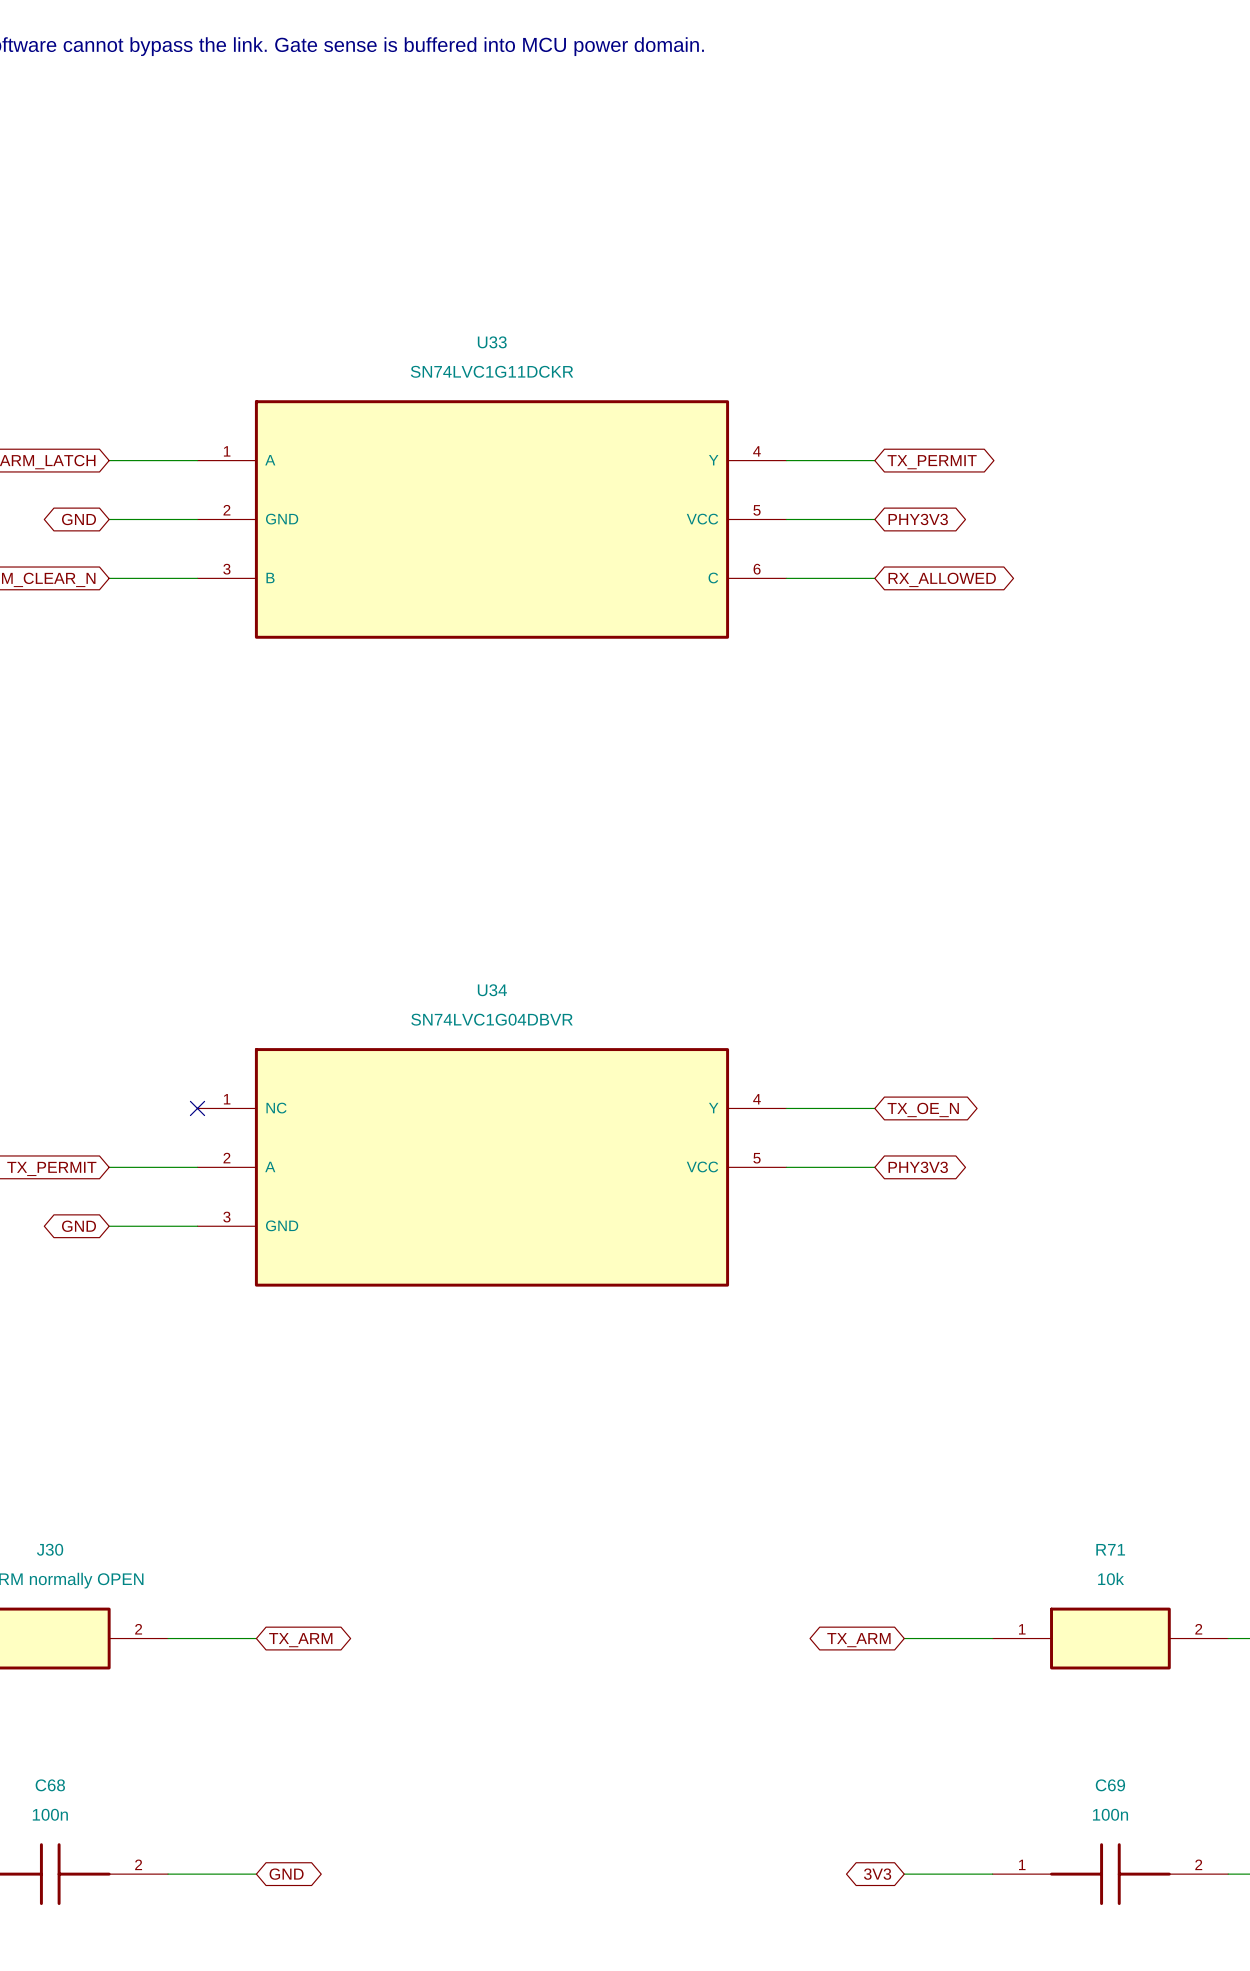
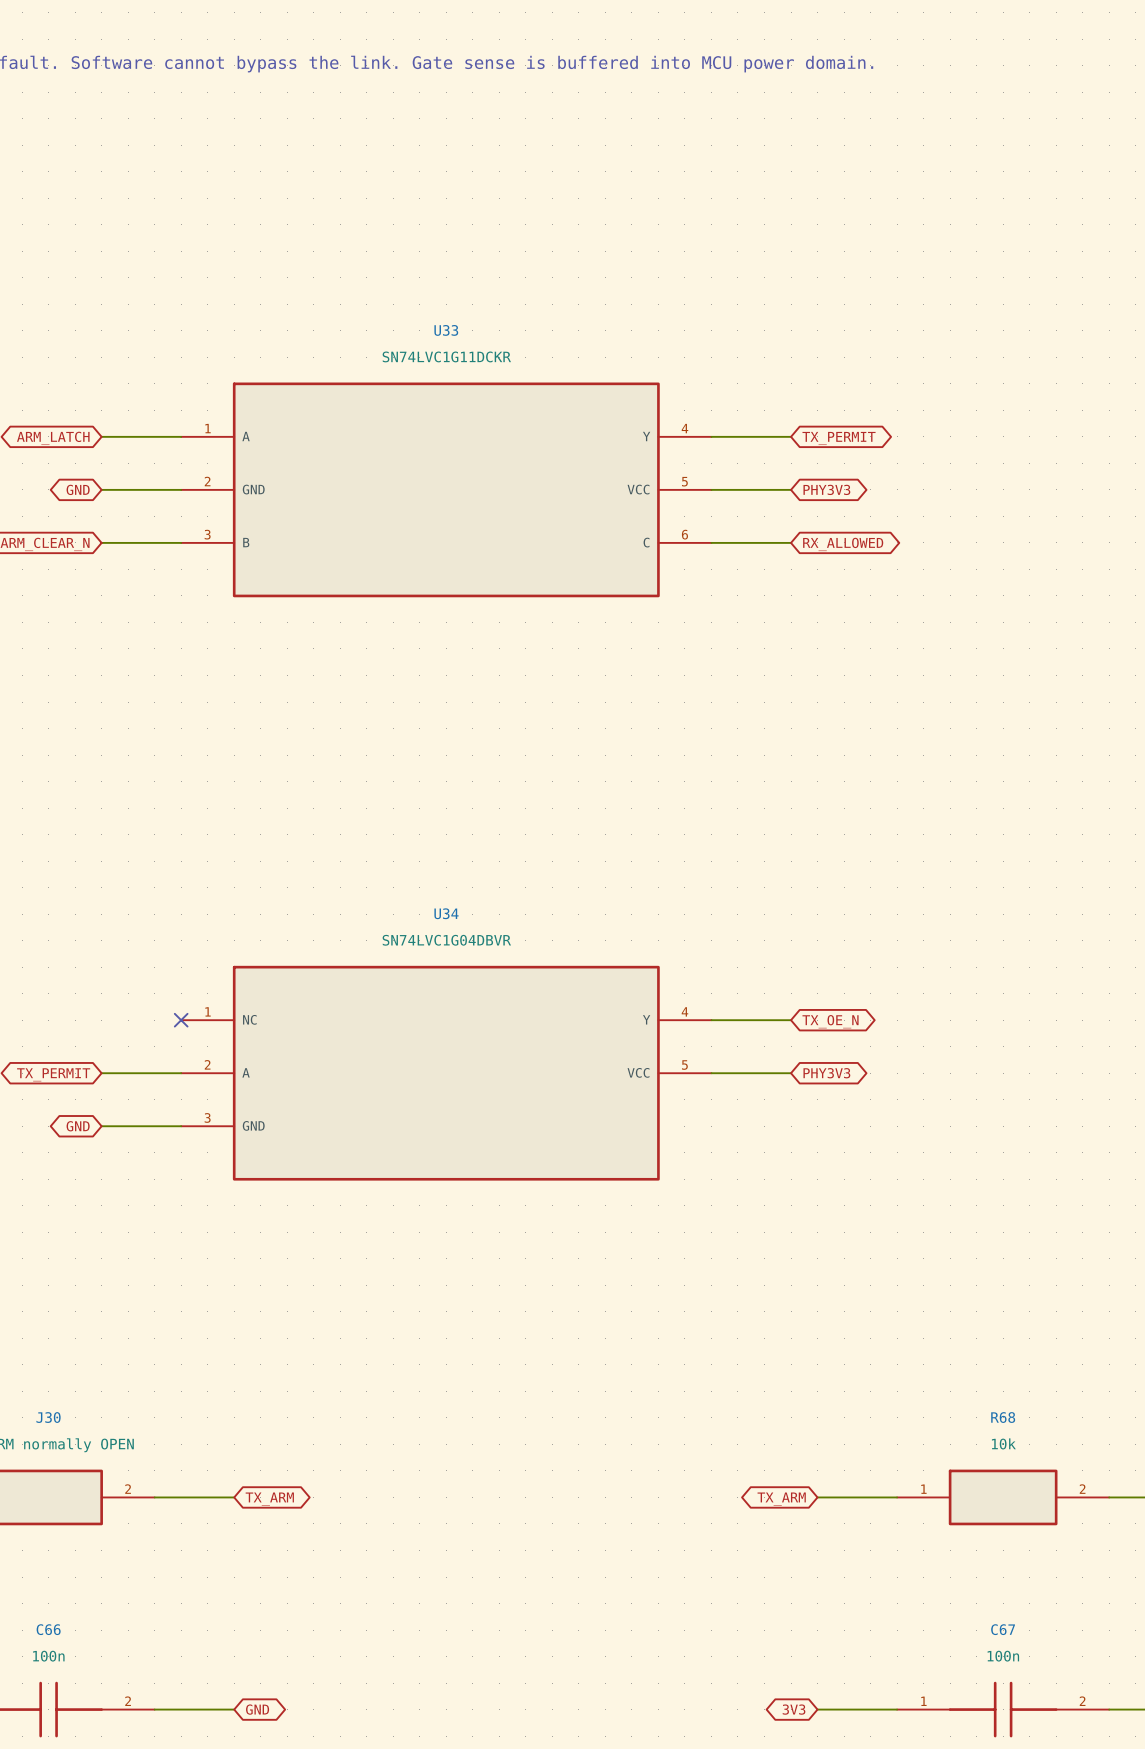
R71 name: R71 (1110, 1549) -> R68 (1003, 1417)
C68 name: C68 (50, 1785) -> C66 (48, 1629)
C69 name: C69 (1110, 1785) -> C67 (1003, 1629)

